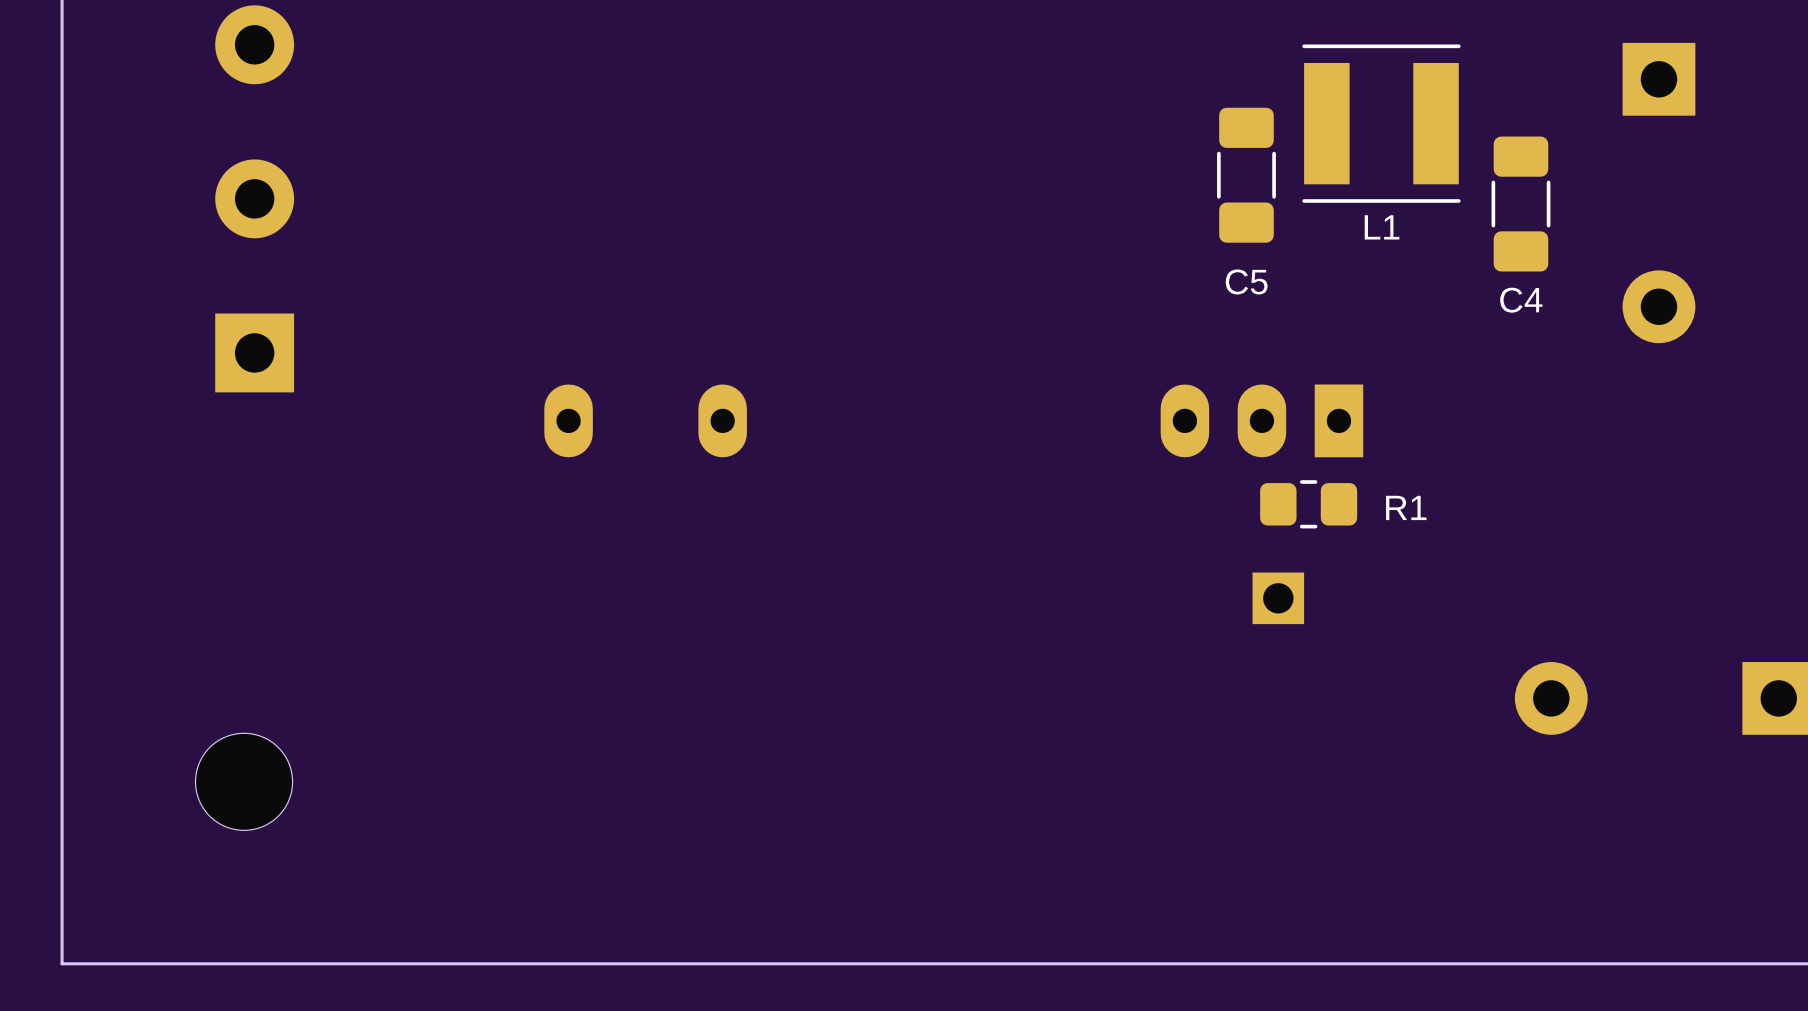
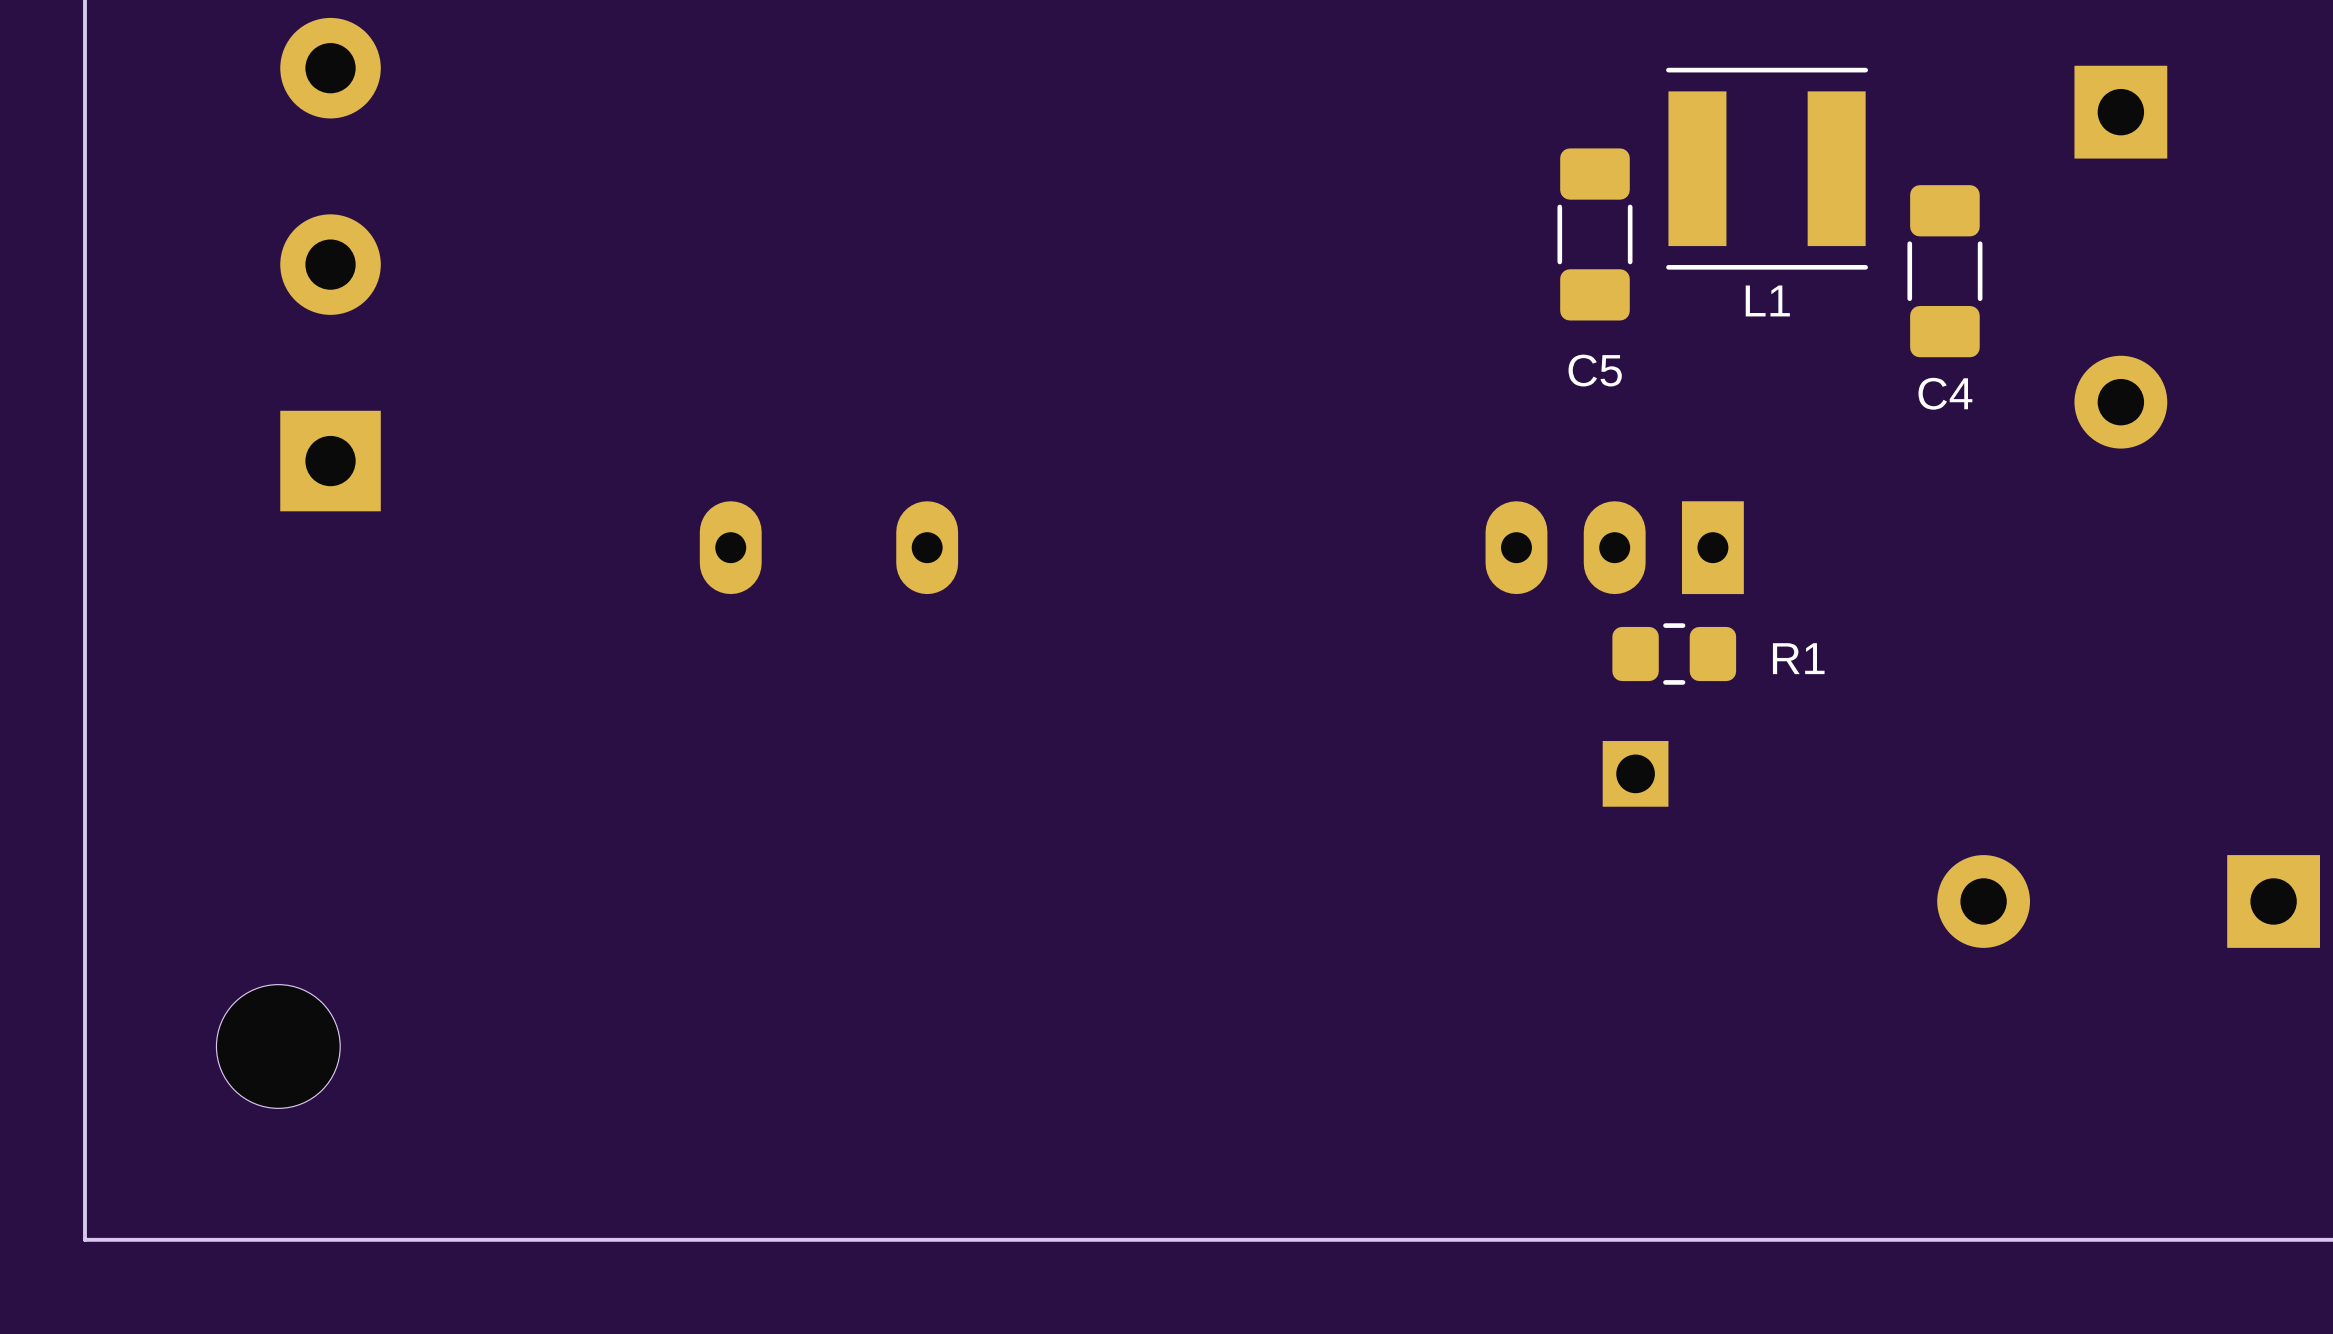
part position: (244, 781) -> (278, 1046)

